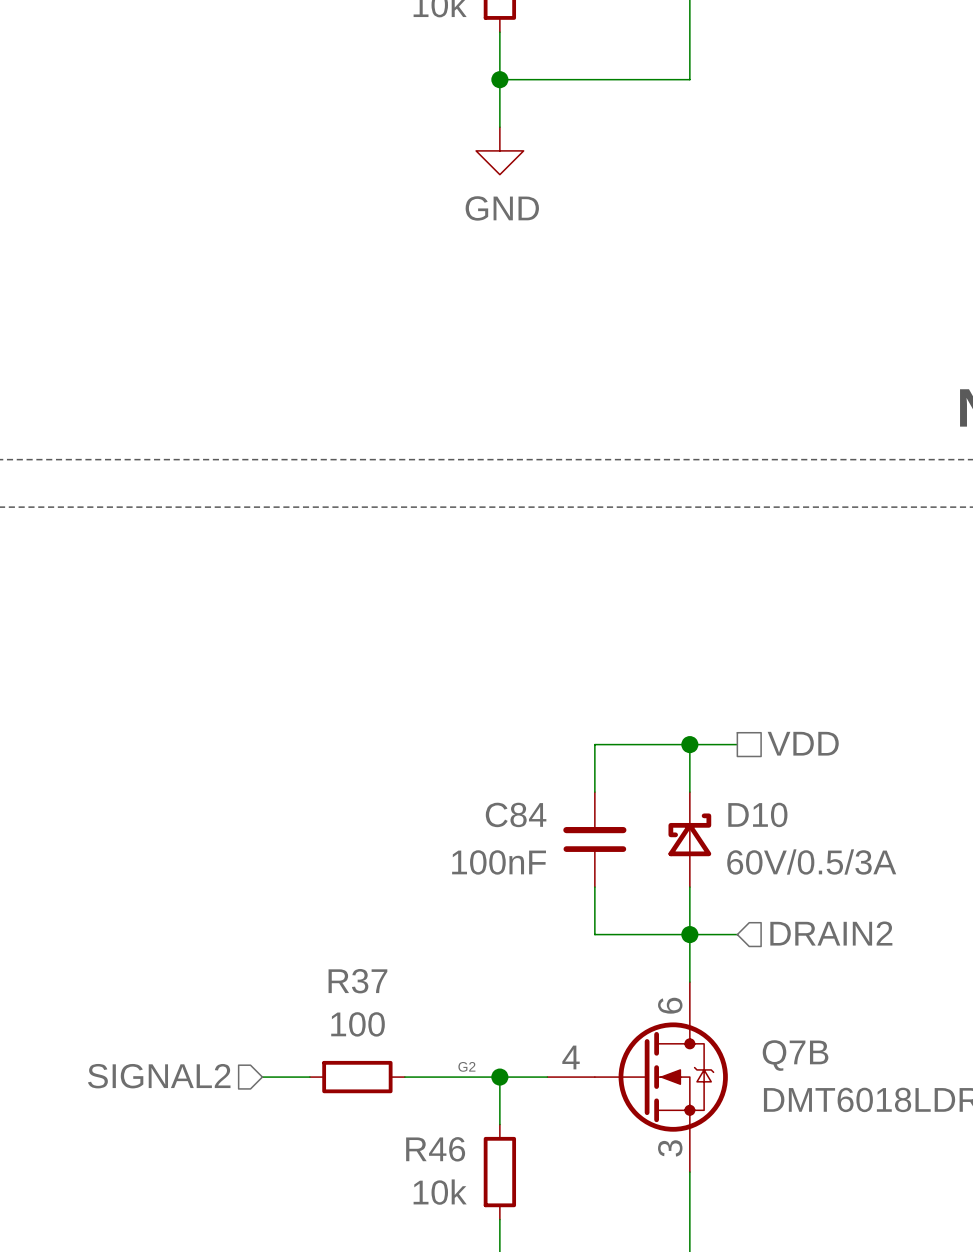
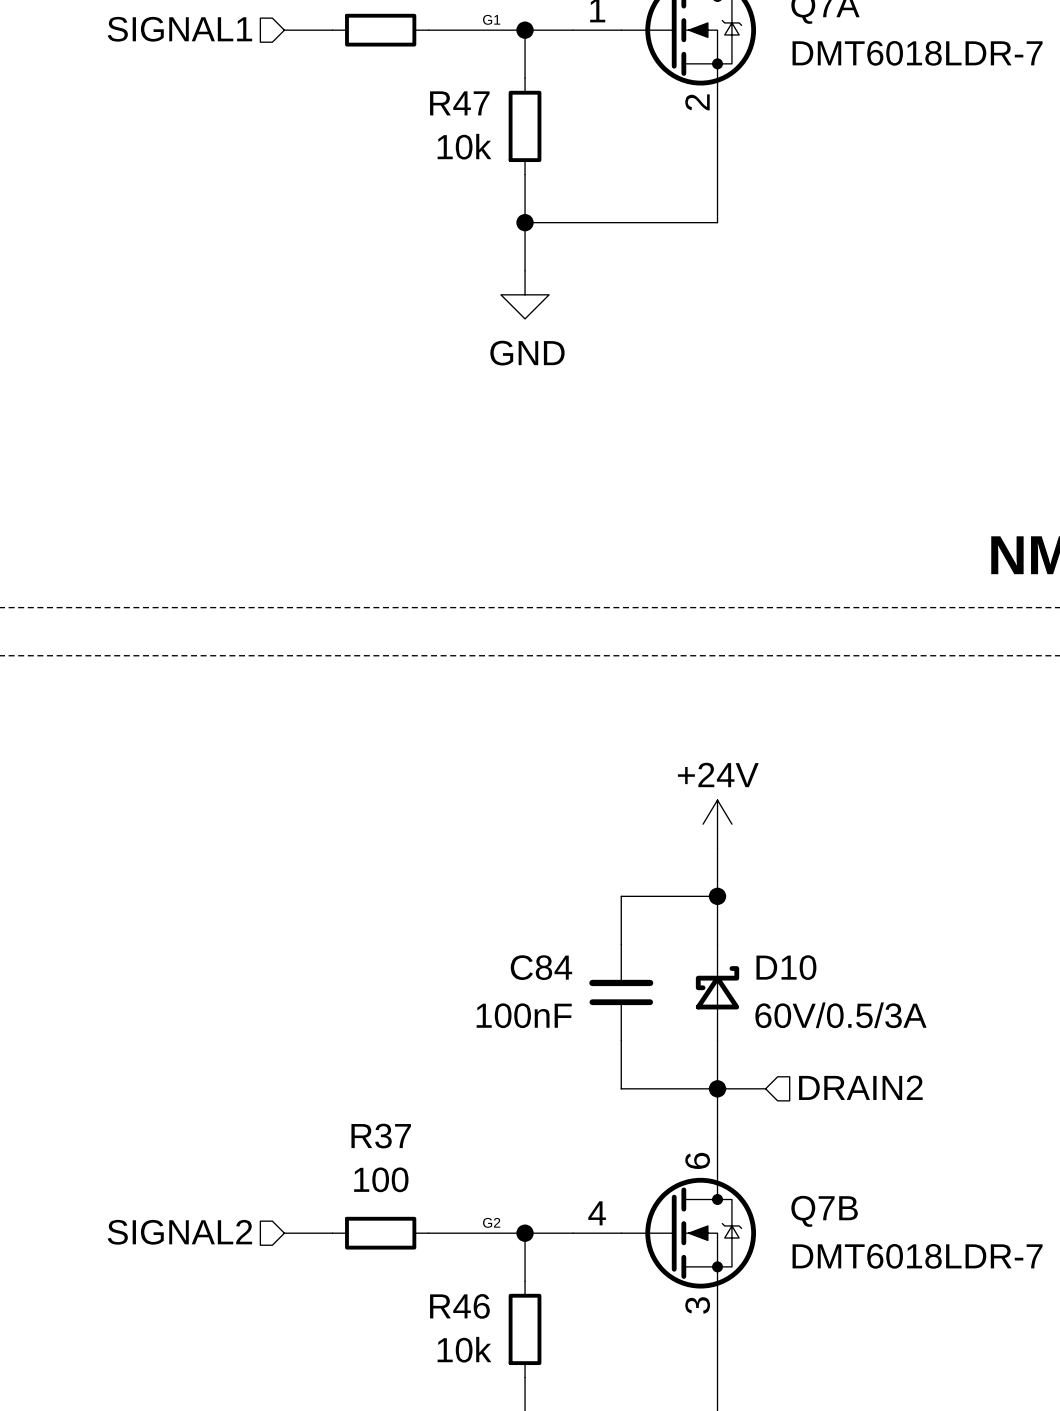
power symbol: none -> +24V (717, 824)
hierarchical label: VDD (803, 743) -> none
wire: (689, 744) (737, 744) -> (717, 896) (717, 848)

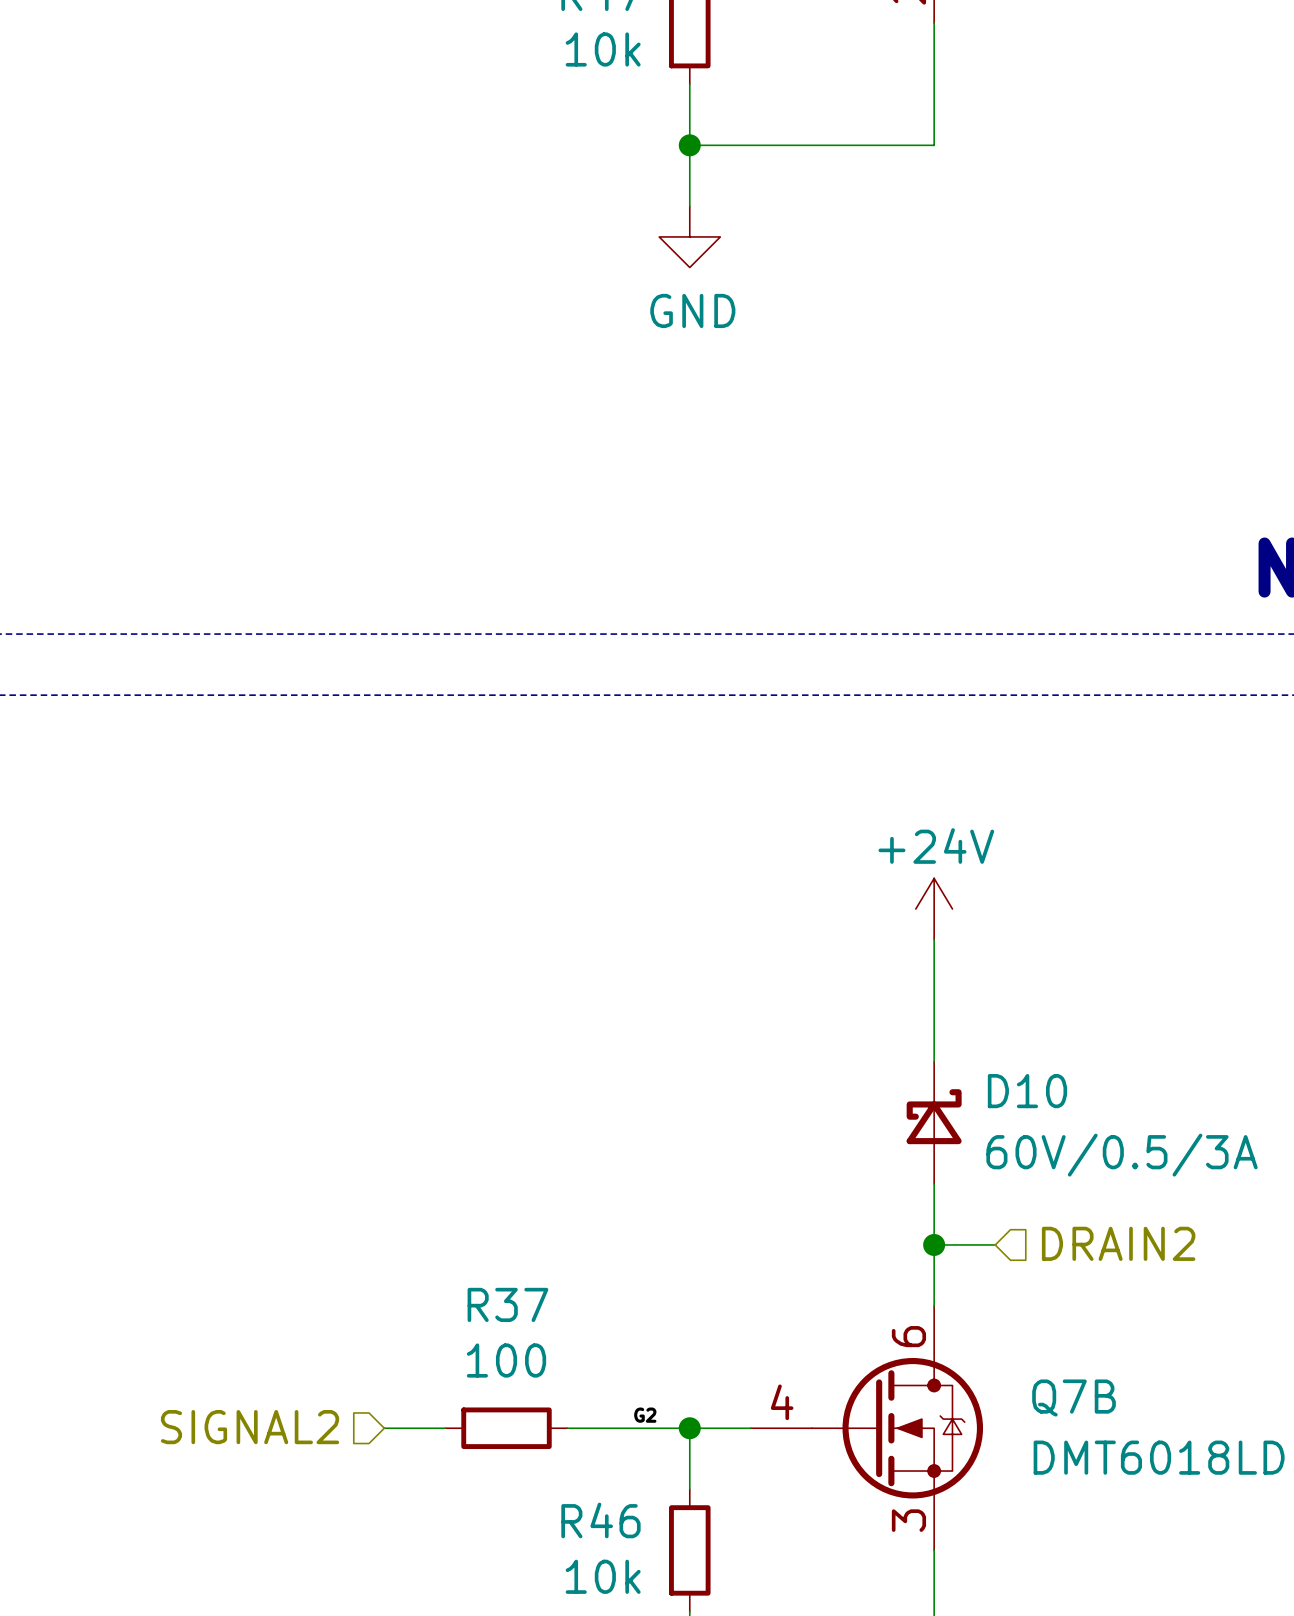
wire: (717, 896) (621, 896) (621, 944) -> none
junction: (717, 896) -> none
C84: 100nF (621, 992) -> none
wire: (621, 1040) (621, 1088) (717, 1088) -> none

